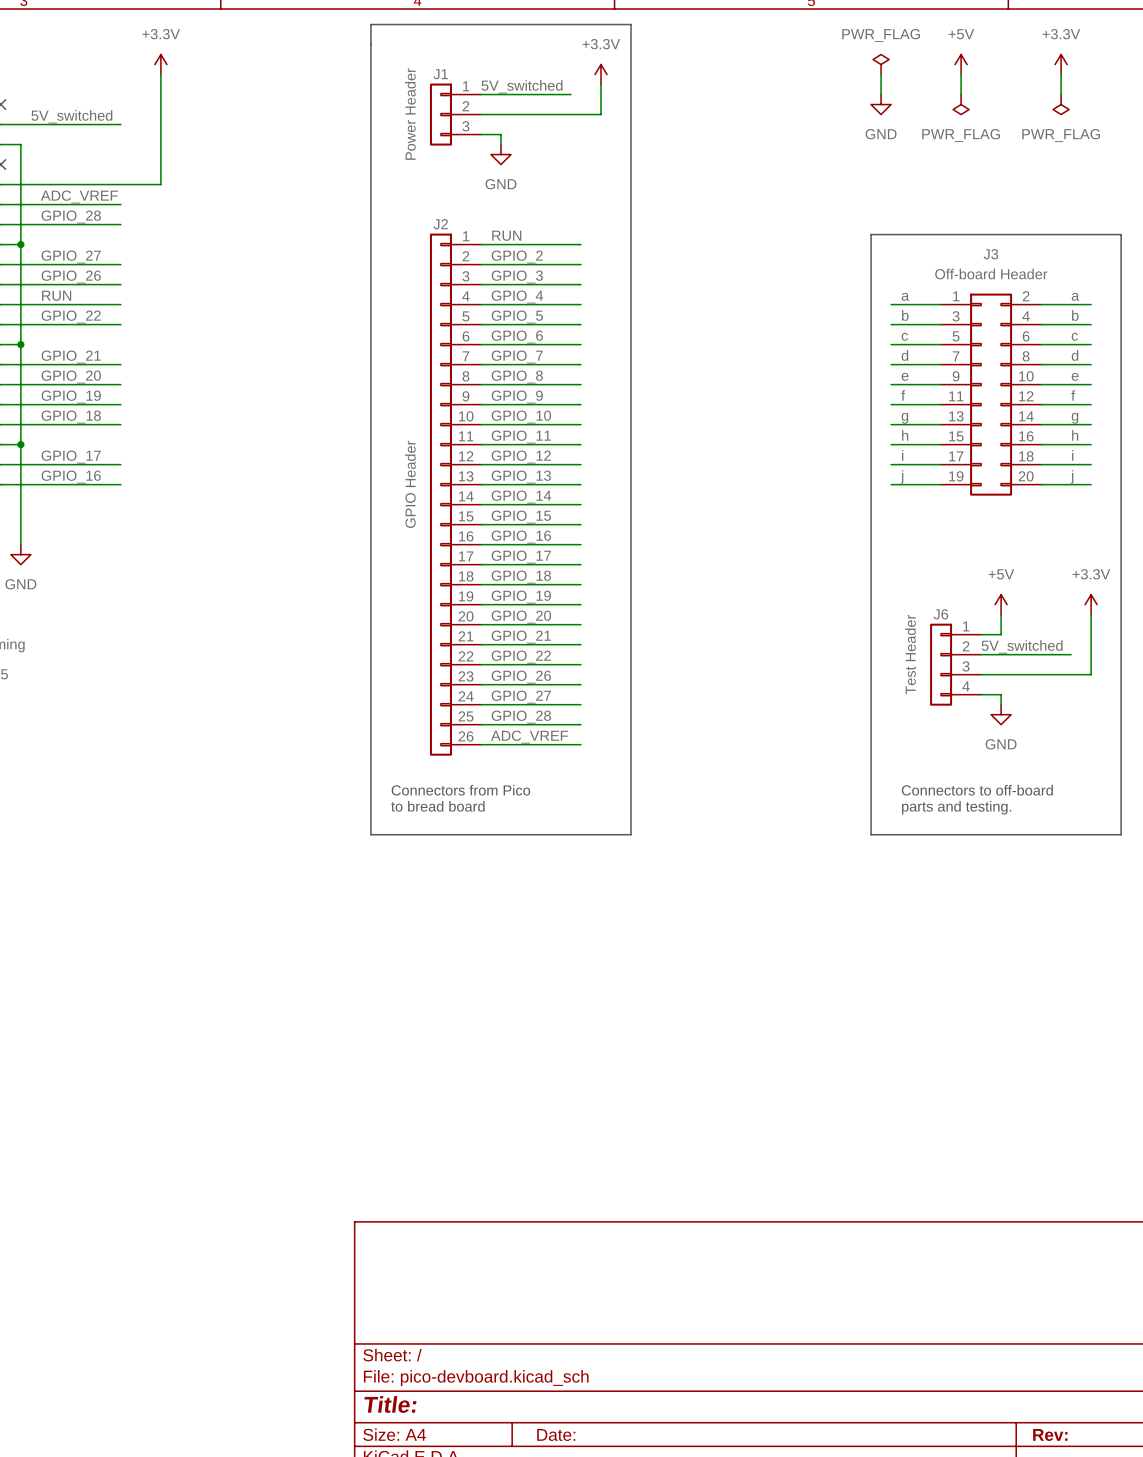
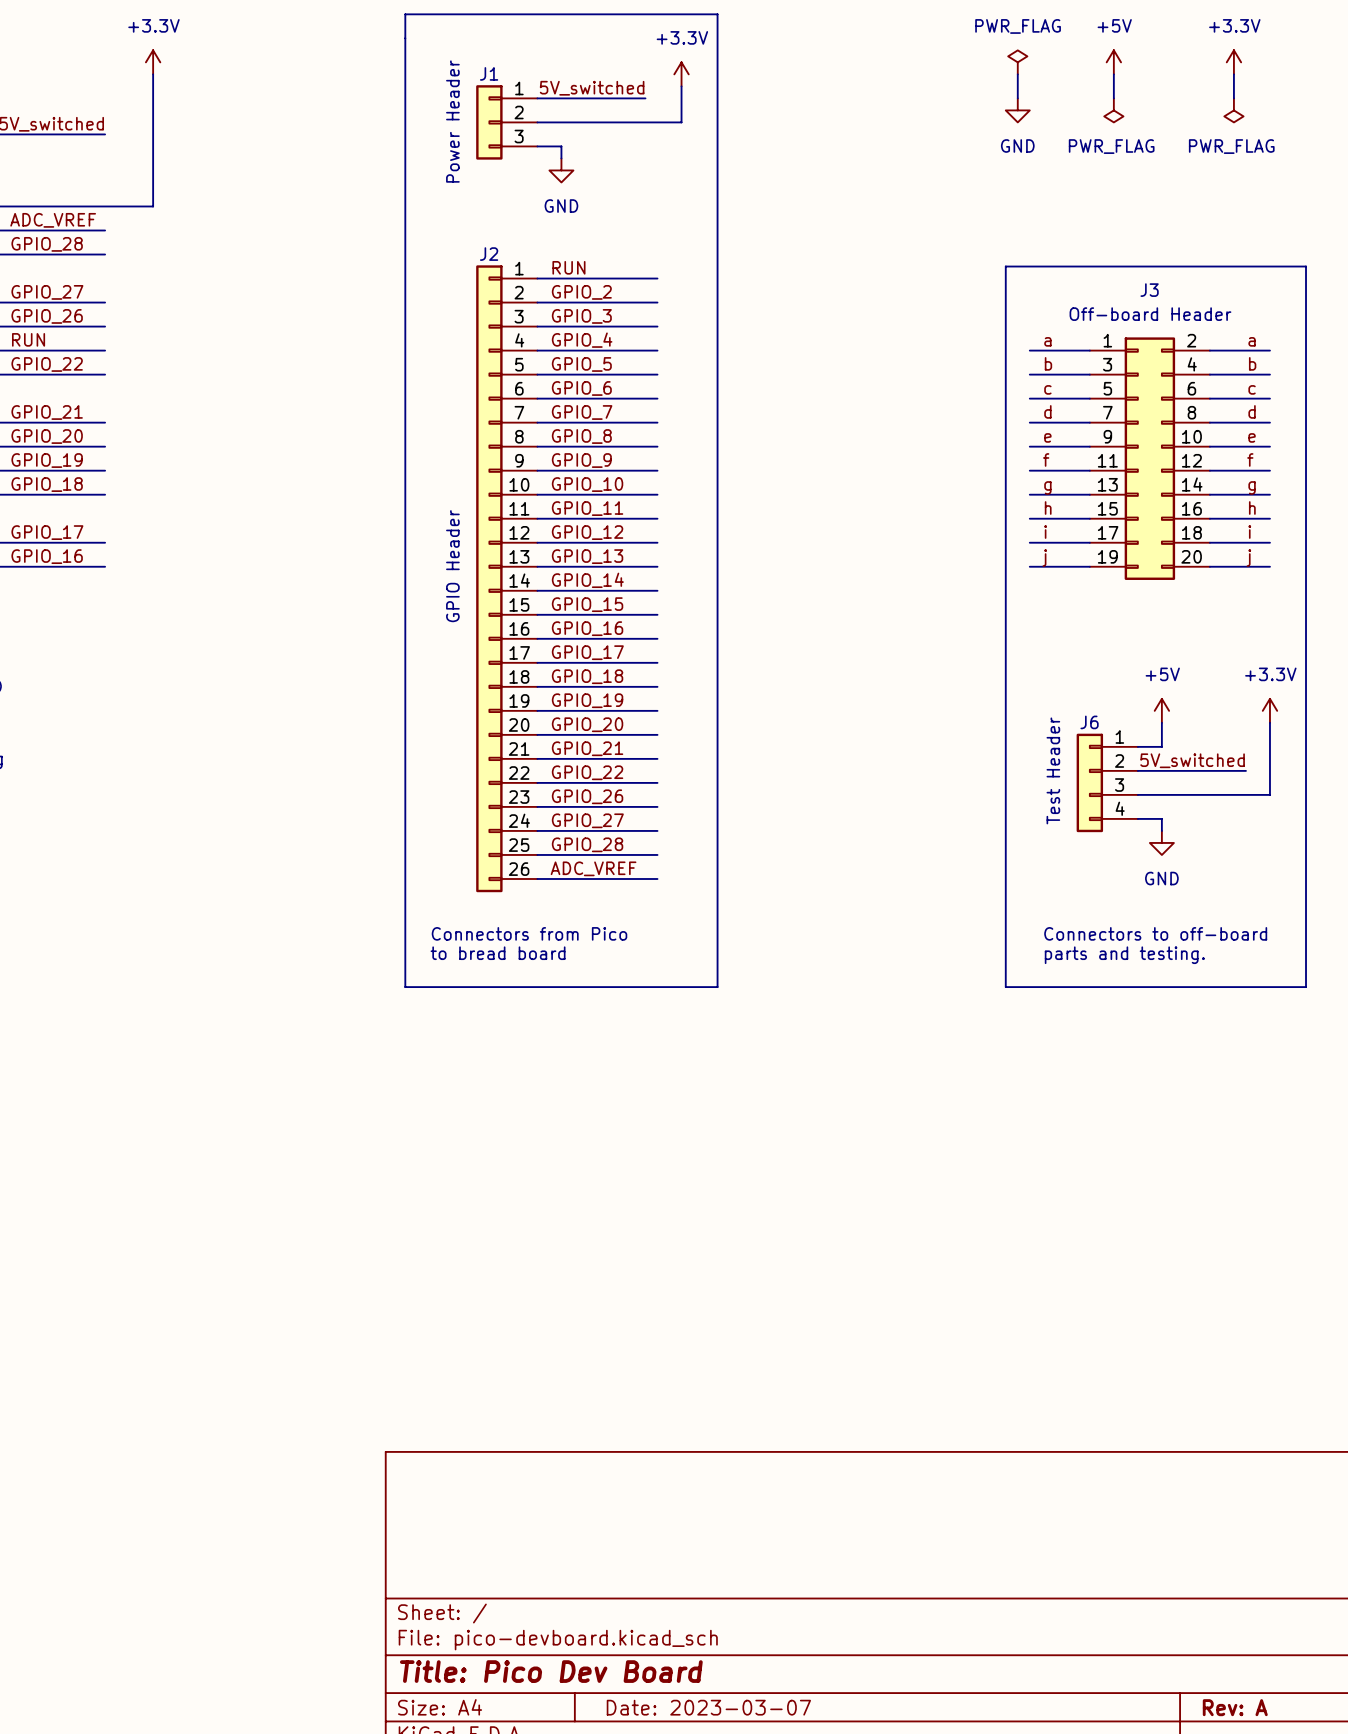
title block: Title: (390, 1404) -> Title: Pico Dev Board (551, 1671)
title block: Date: (556, 1434) -> Date: 2023-03-07 (708, 1707)
title block: Rev: (1050, 1434) -> Rev: A (1235, 1707)

